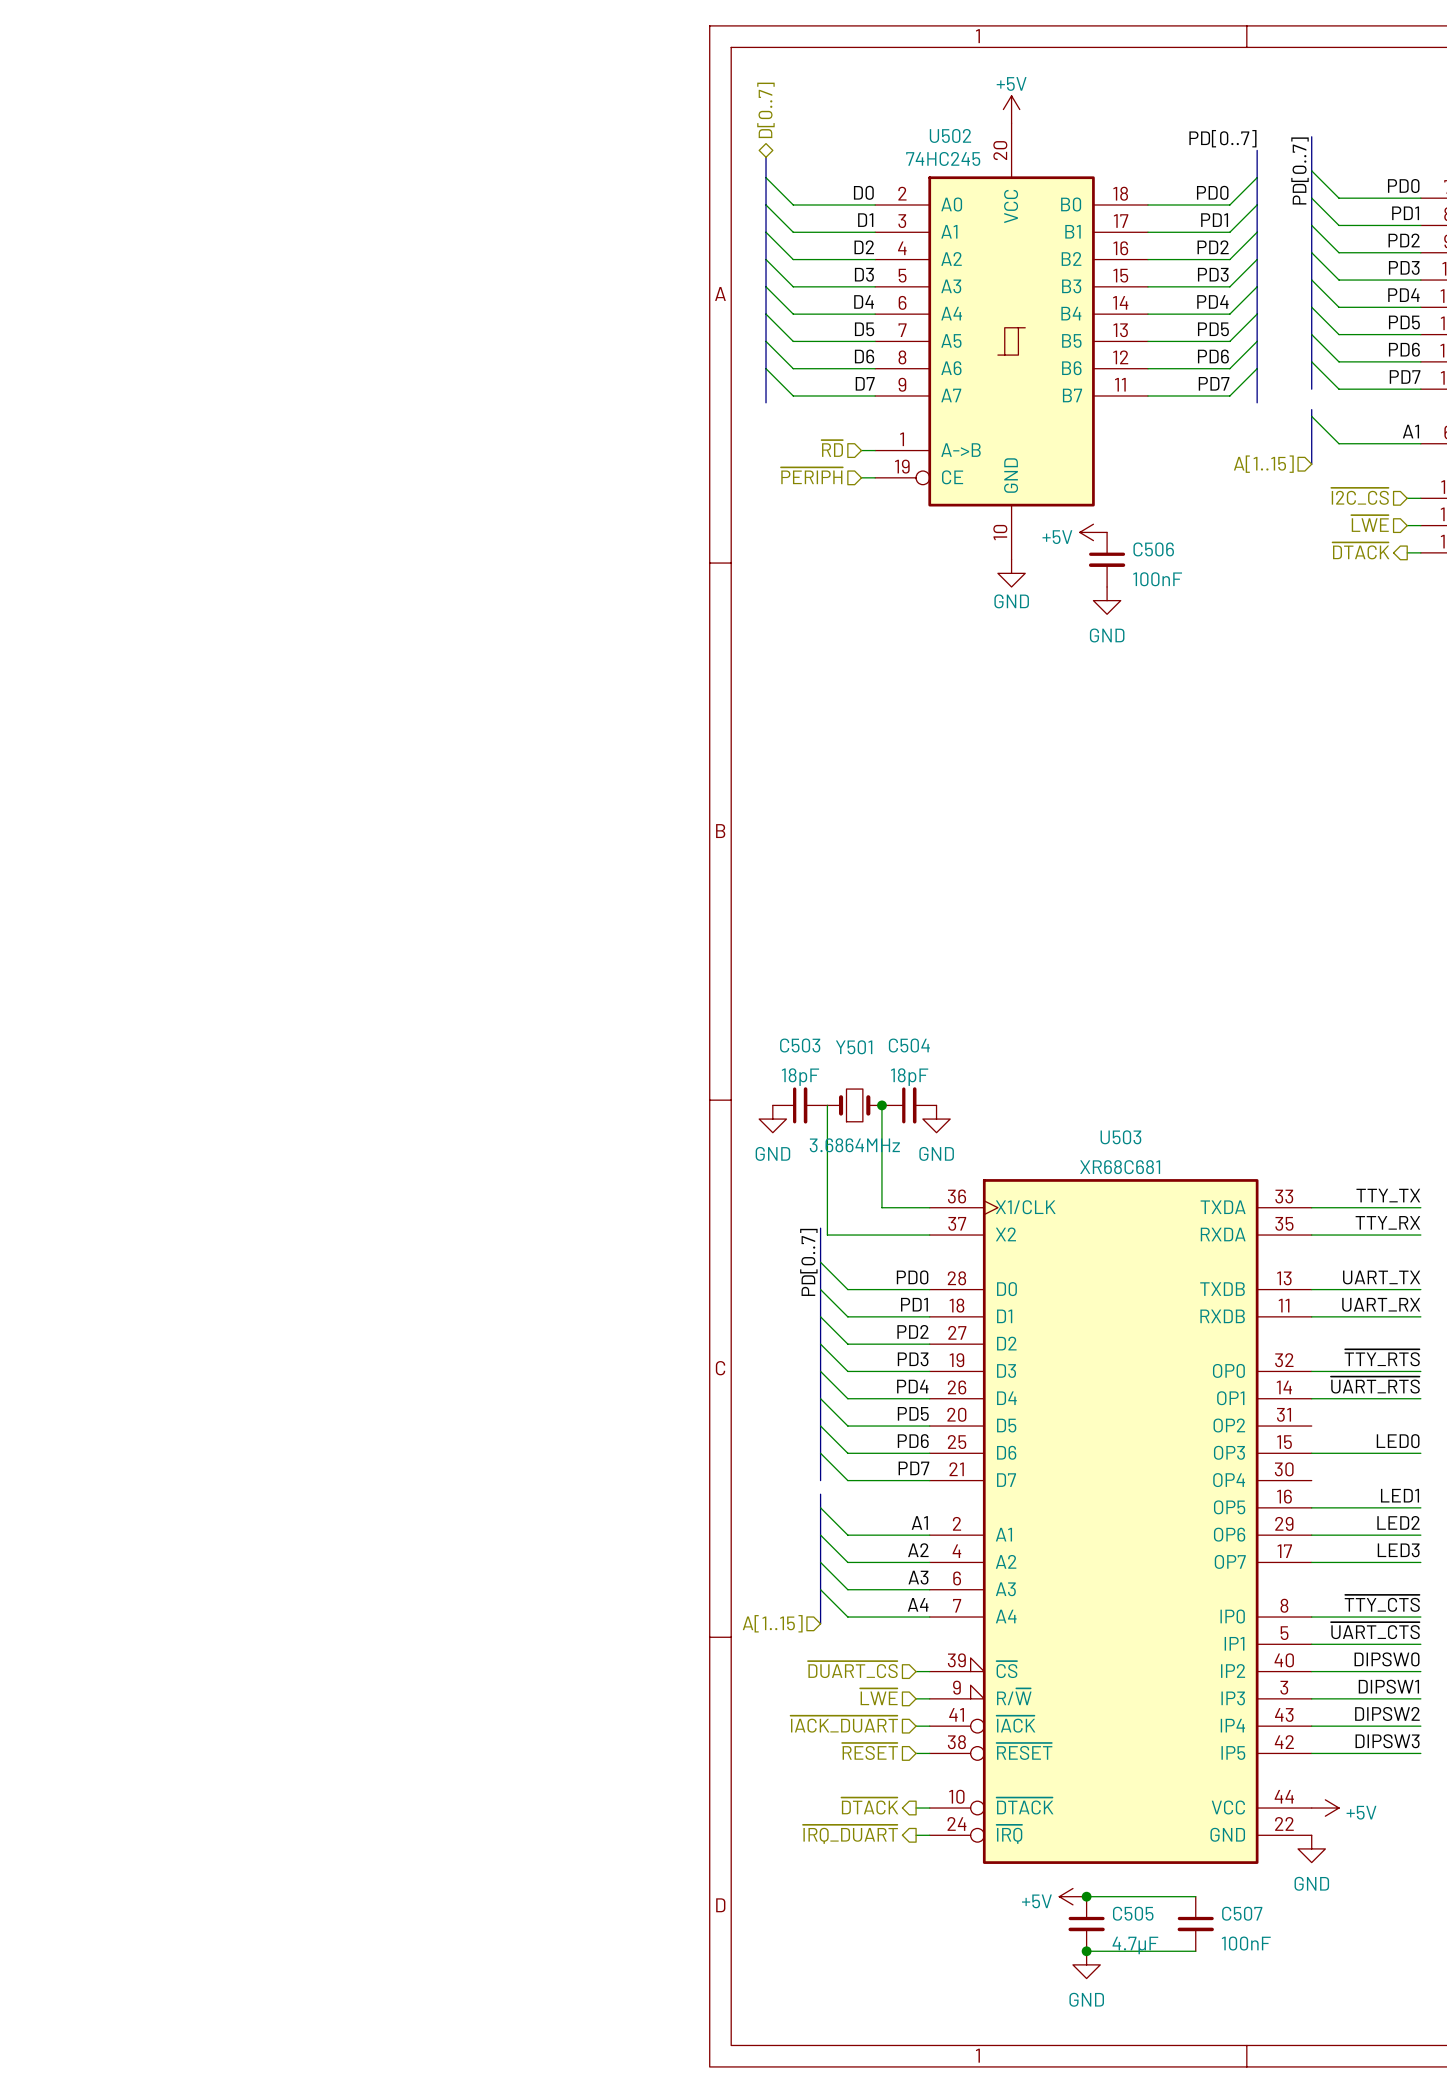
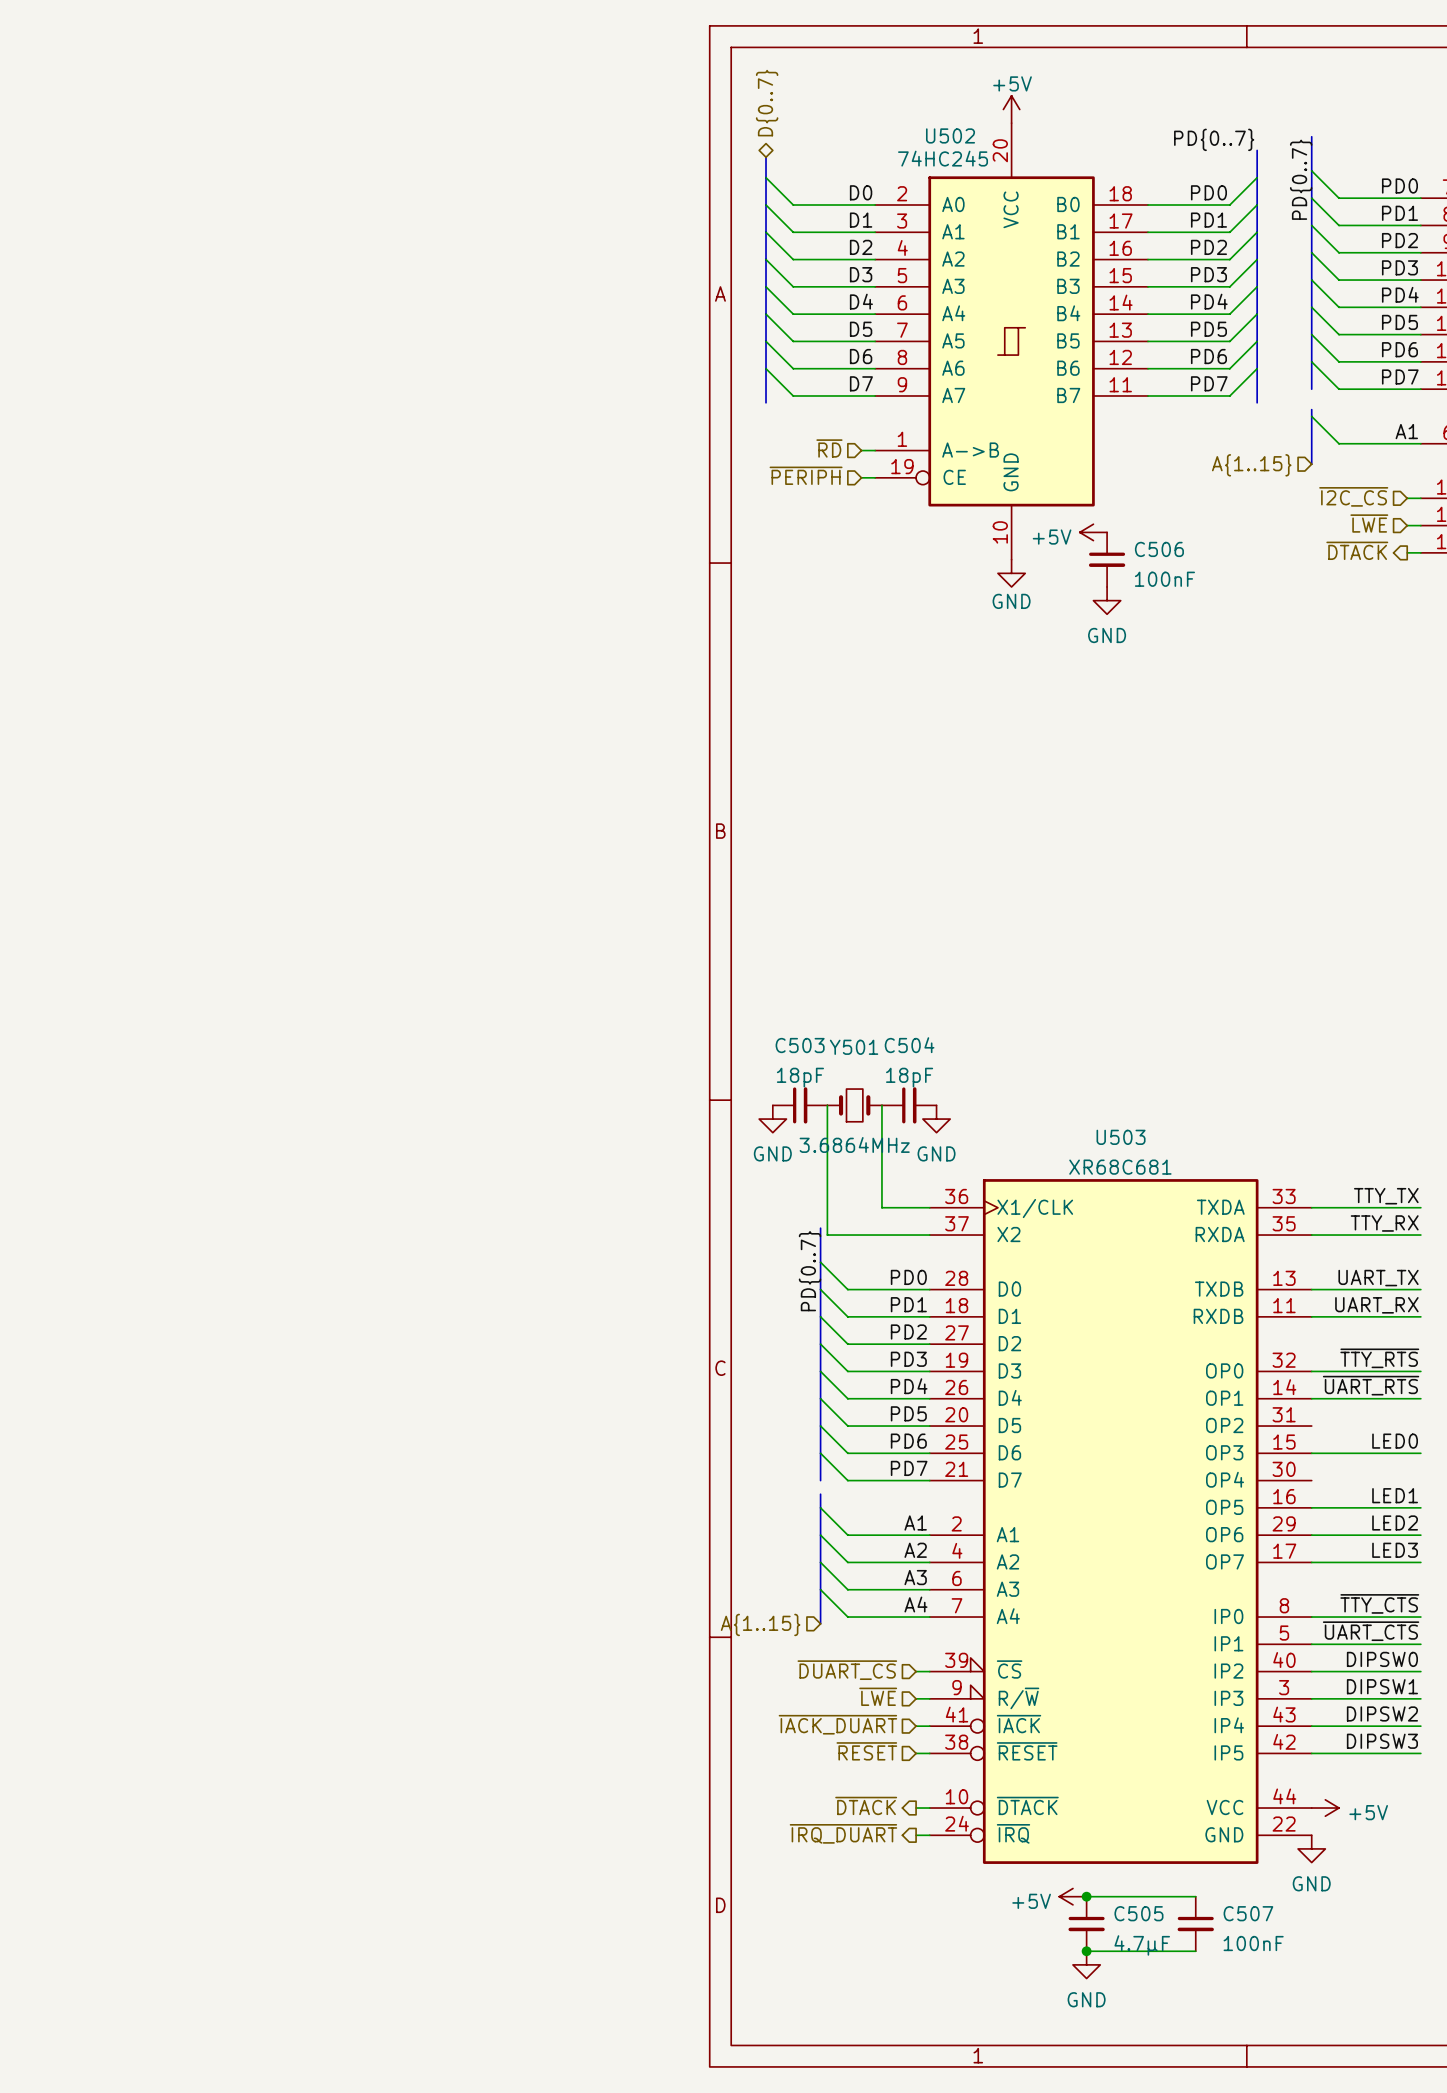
hierarchical label: D[0..7] (765, 110) -> D{0..7} (767, 103)
label: PD[0..7] (1222, 138) -> PD{0..7} (1214, 139)
label: PD[0..7] (1299, 170) -> PD{0..7} (1301, 179)
hierarchical label: A[1..15] (1263, 464) -> A{1..15} (1251, 465)
junction: (881, 1105) -> none
label: PD[0..7] (808, 1262) -> PD{0..7} (810, 1271)
hierarchical label: A[1..15] (772, 1623) -> A{1..15} (760, 1624)

